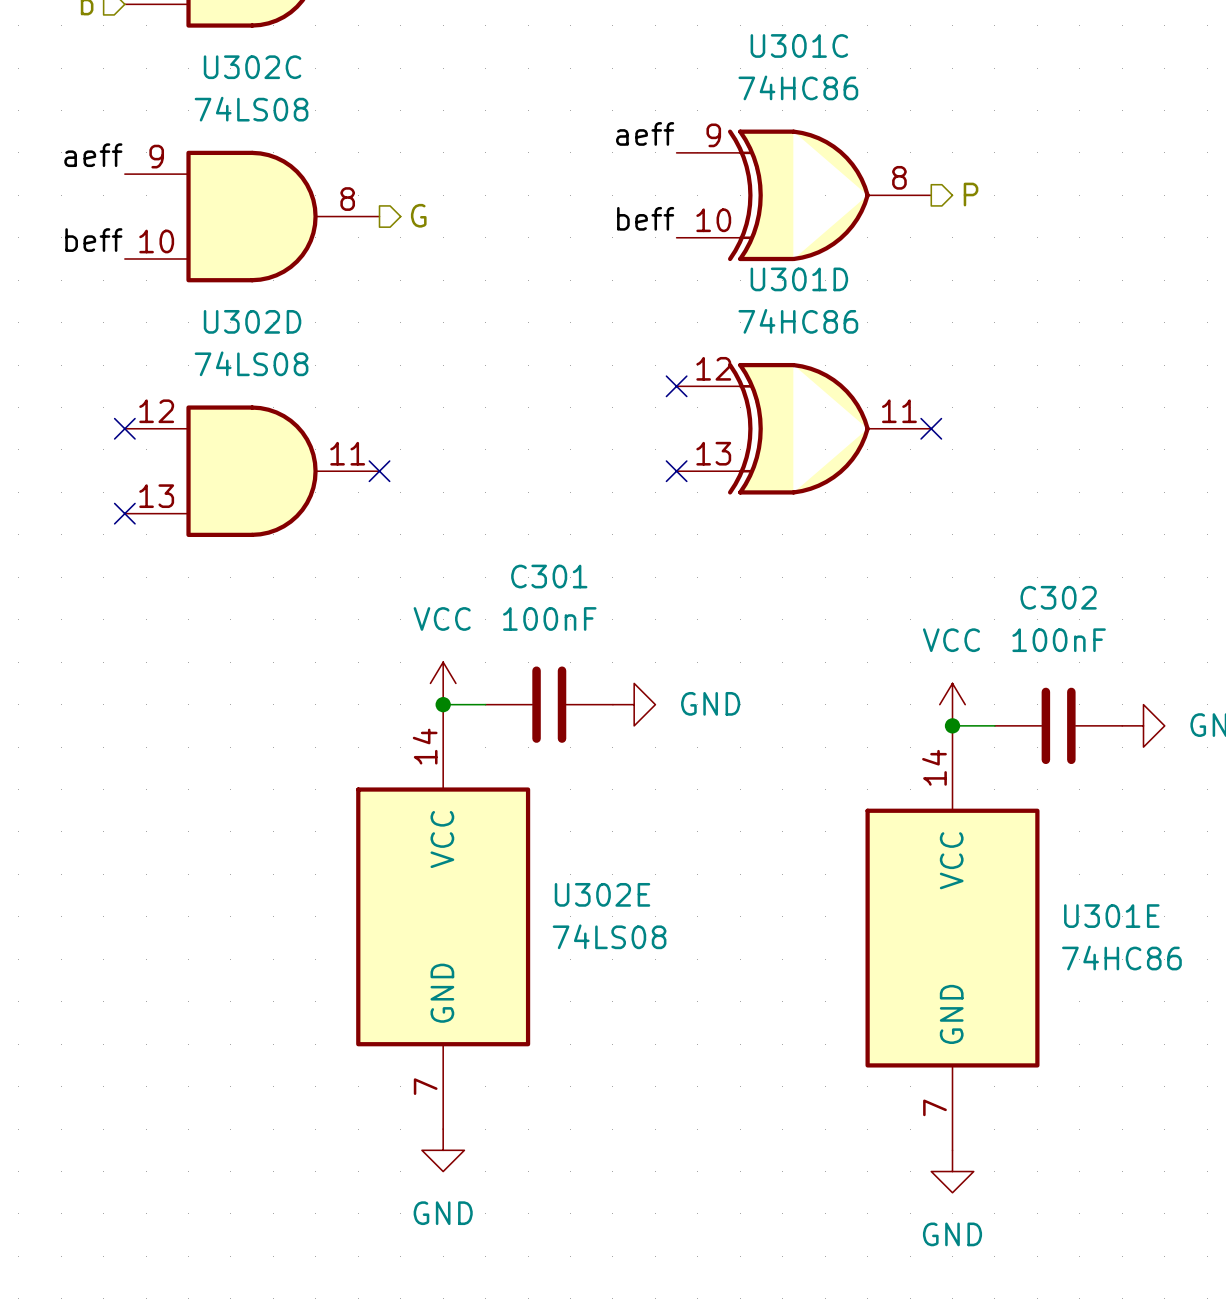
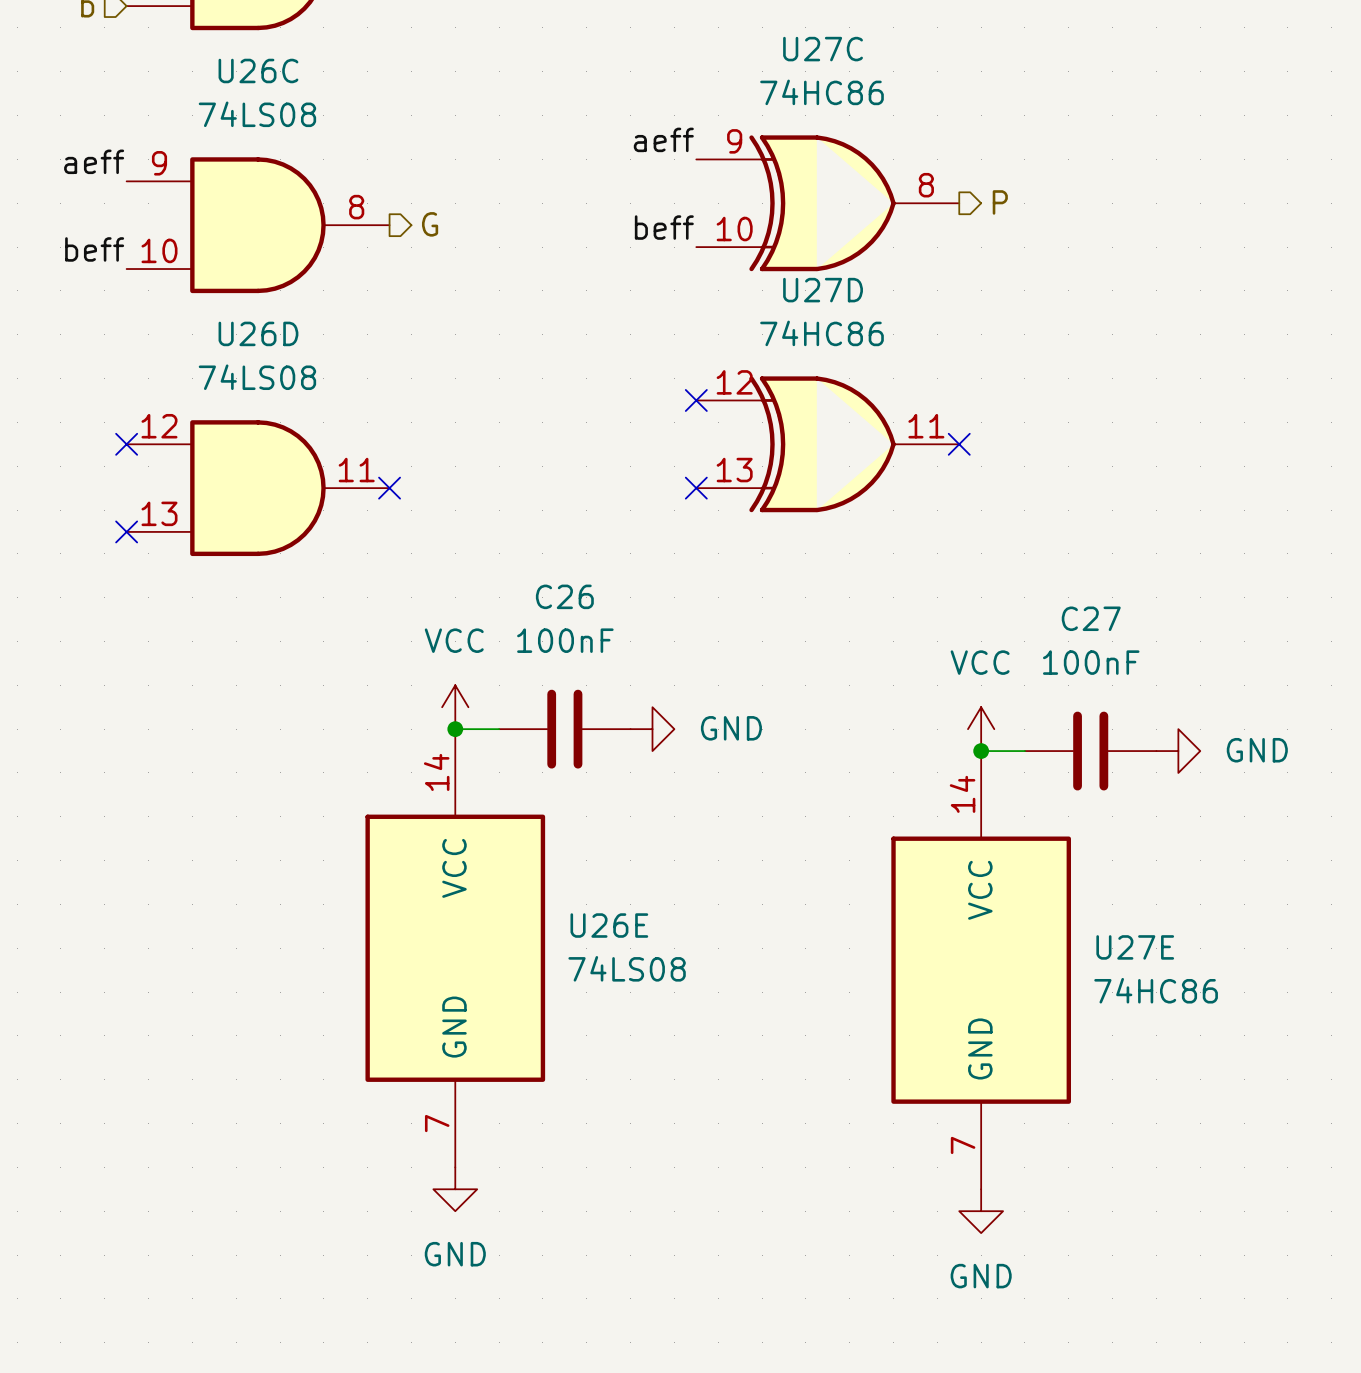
U301C name: U301C (799, 45) -> U27C (823, 49)
U302C name: U302C (252, 67) -> U26C (258, 70)
U301D name: U301D (799, 279) -> U27D (823, 290)
U302D name: U302D (252, 321) -> U26D (258, 333)
C301 name: C301 (549, 576) -> C26 (564, 596)
C302 name: C302 (1058, 597) -> C27 (1091, 618)
U302E name: U302E (602, 894) -> U26E (609, 925)
U301E name: U301E (1111, 916) -> U27E (1135, 947)

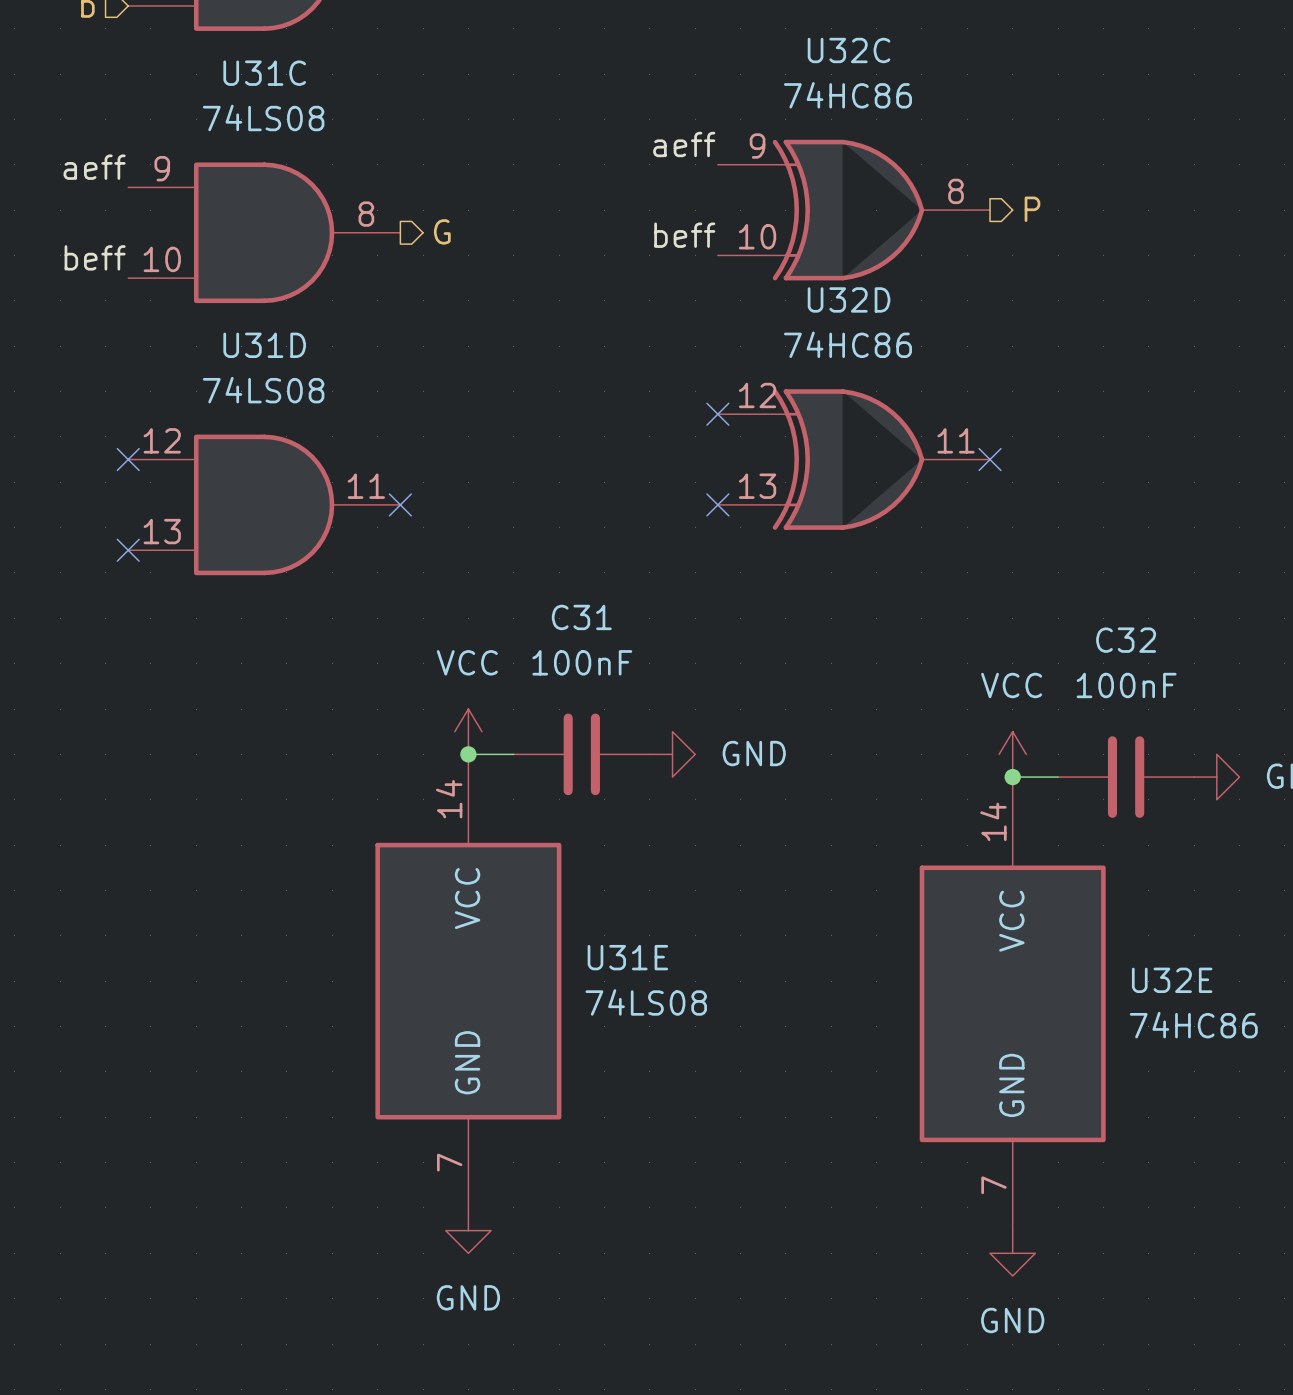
U27C name: U27C (823, 49) -> U32C (849, 50)
U26C name: U26C (258, 70) -> U31C (264, 73)
U27D name: U27D (823, 290) -> U32D (849, 299)
U26D name: U26D (258, 333) -> U31D (264, 345)
C26 name: C26 (564, 596) -> C31 (581, 617)
C27 name: C27 (1091, 618) -> C32 (1126, 640)
U26E name: U26E (609, 925) -> U31E (627, 957)
U27E name: U27E (1135, 947) -> U32E (1172, 980)

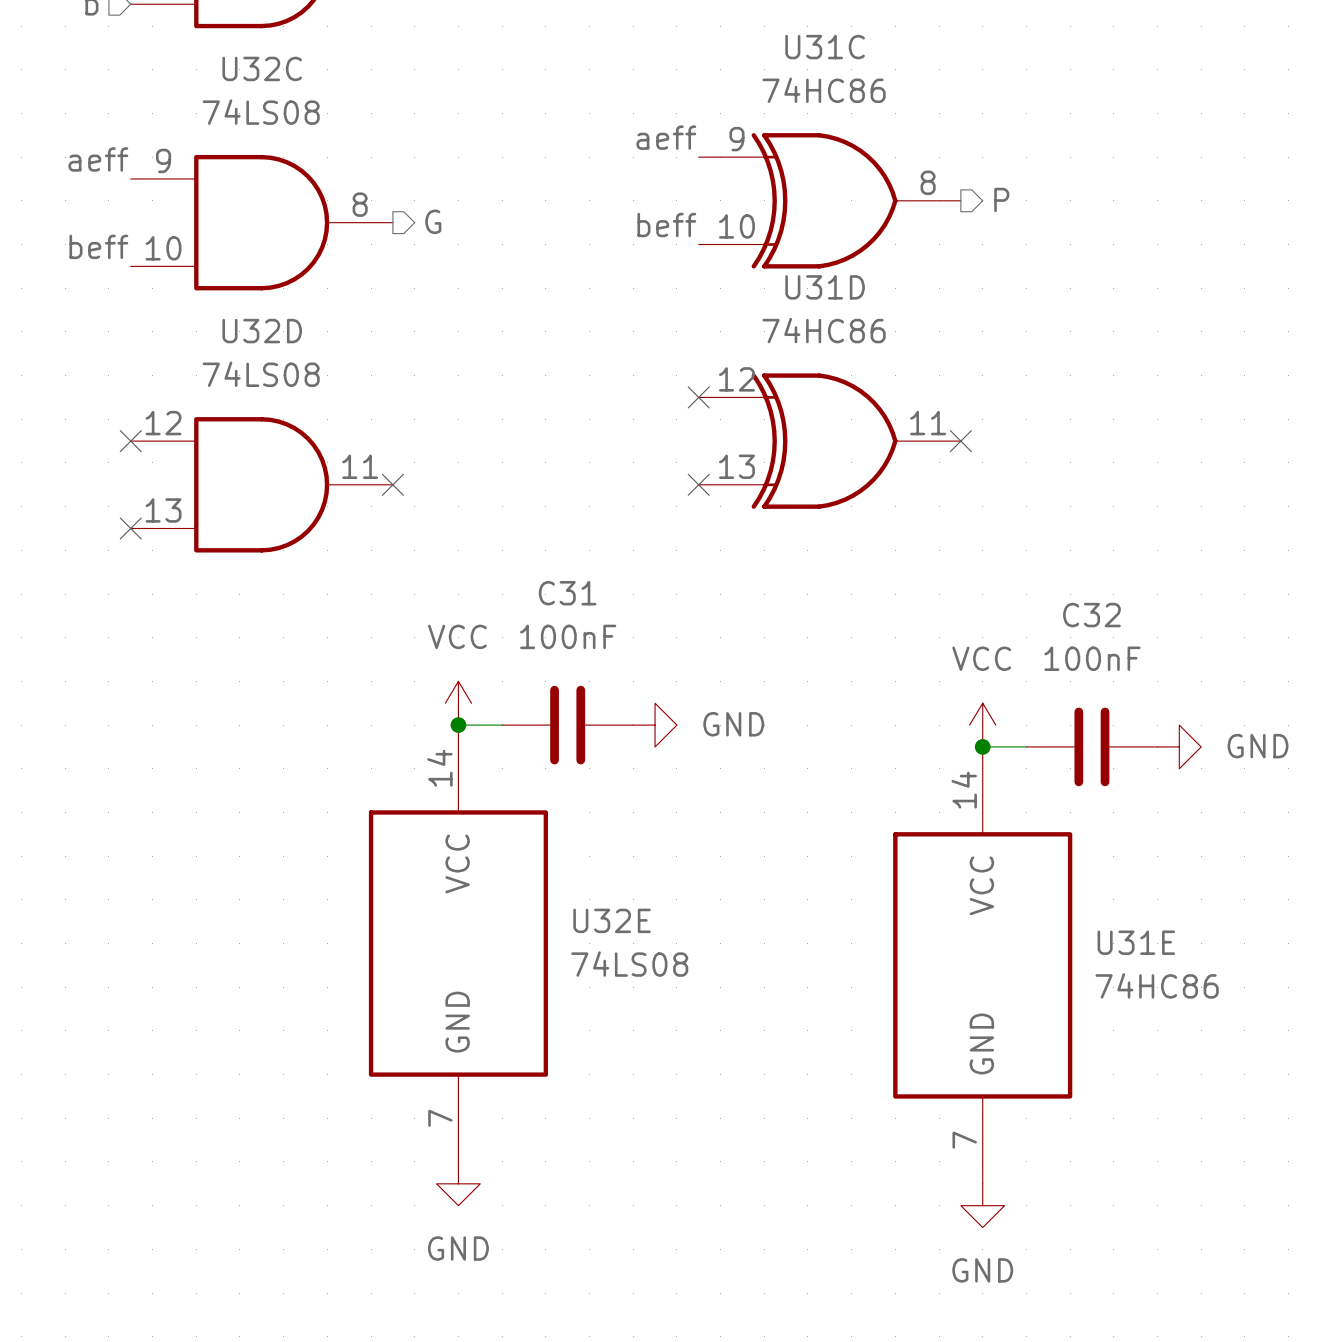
U32C name: U32C (849, 50) -> U31C (825, 47)
U31C name: U31C (264, 73) -> U32C (262, 68)
U32D name: U32D (849, 299) -> U31D (825, 287)
U31D name: U31D (264, 345) -> U32D (262, 331)
U31E name: U31E (627, 957) -> U32E (612, 920)
U32E name: U32E (1172, 980) -> U31E (1136, 942)

